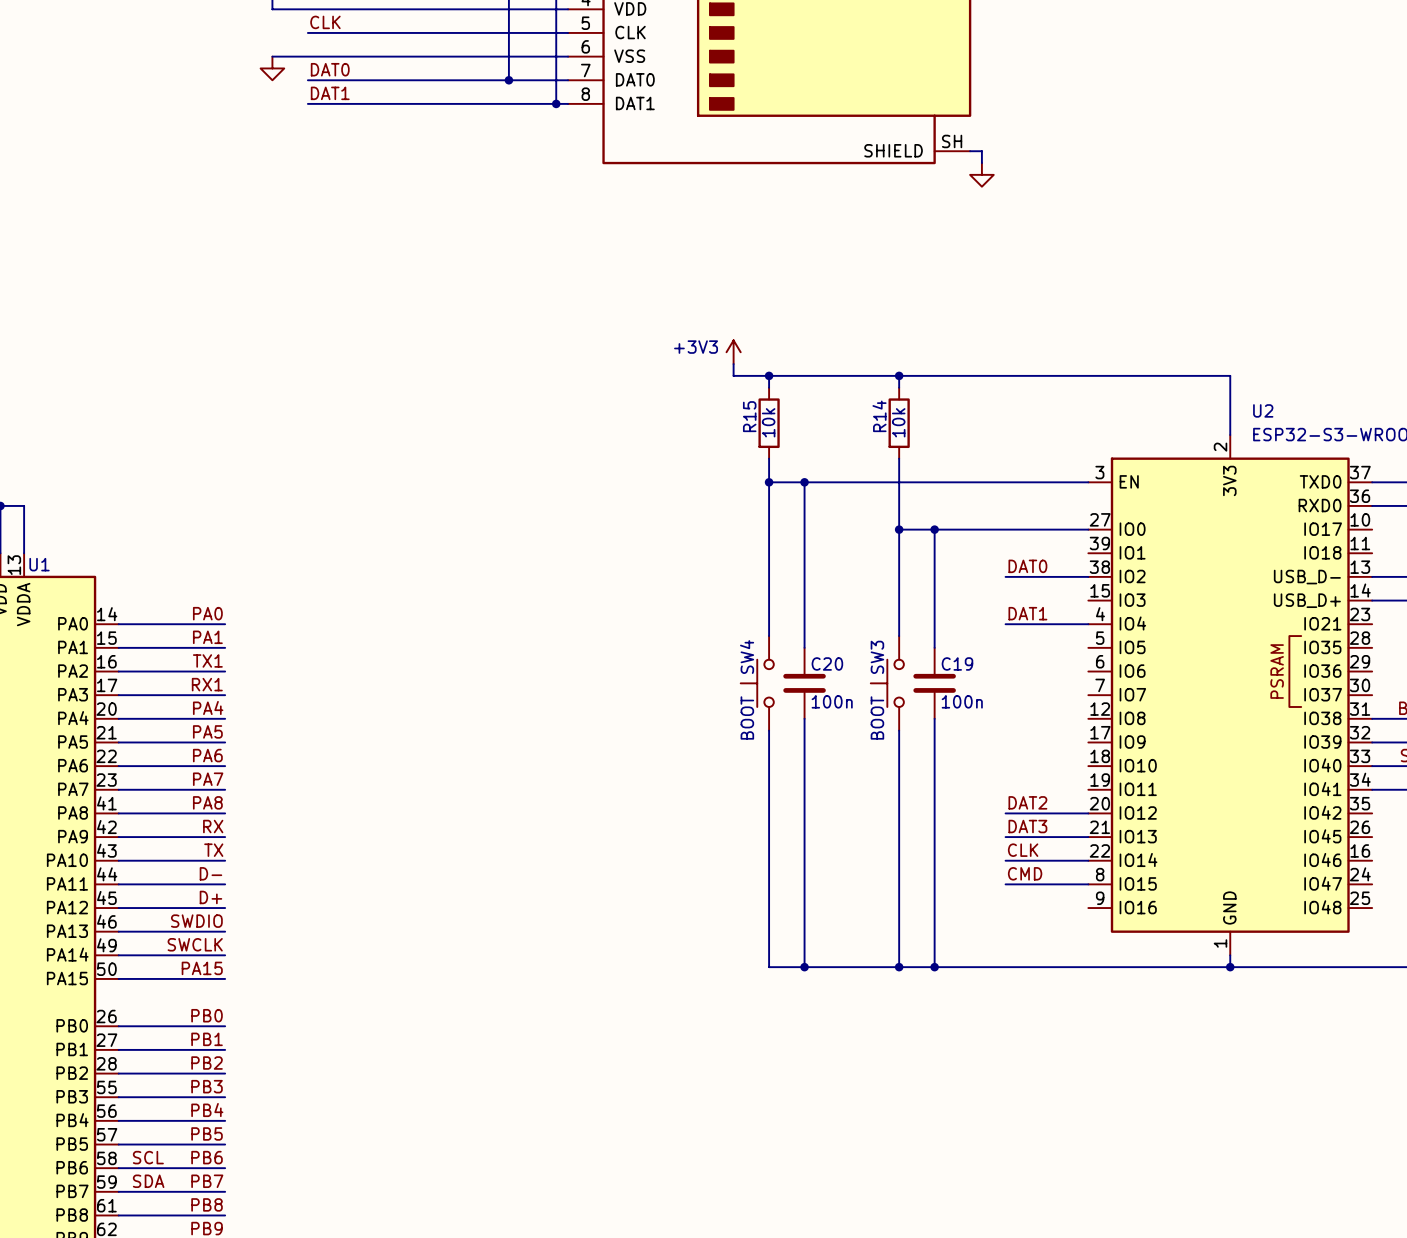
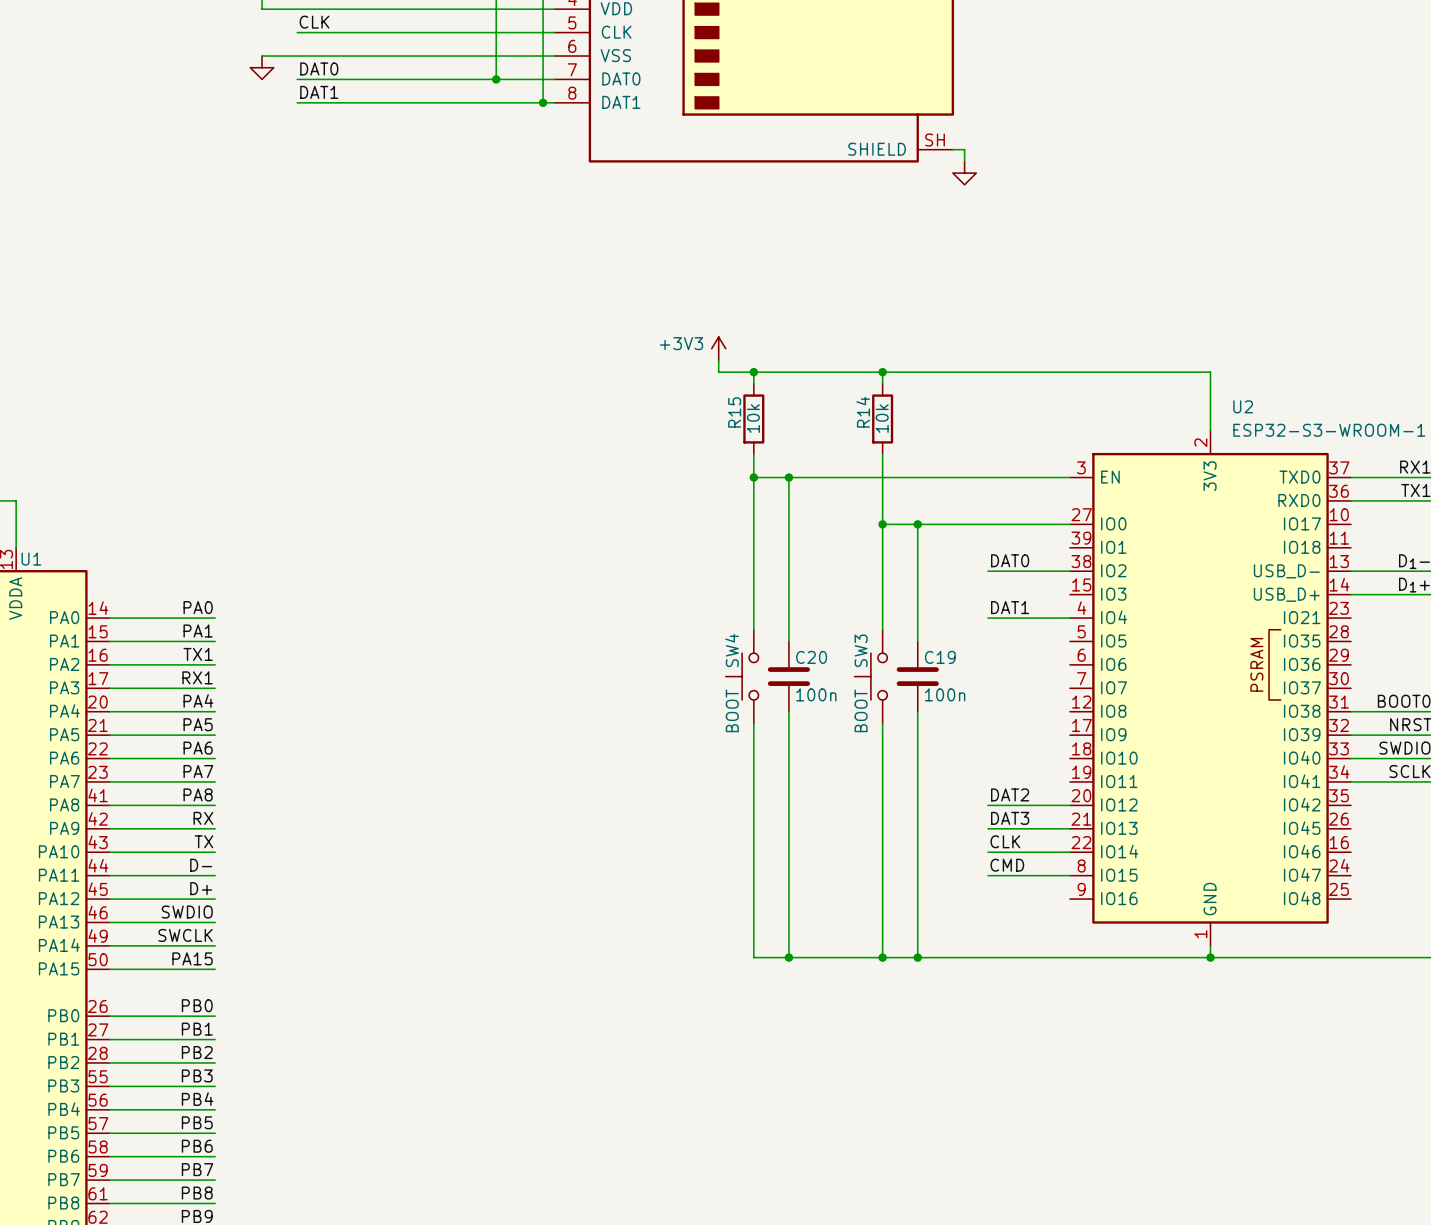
label: SCL (148, 1157) -> none
label: SDA (148, 1181) -> none

